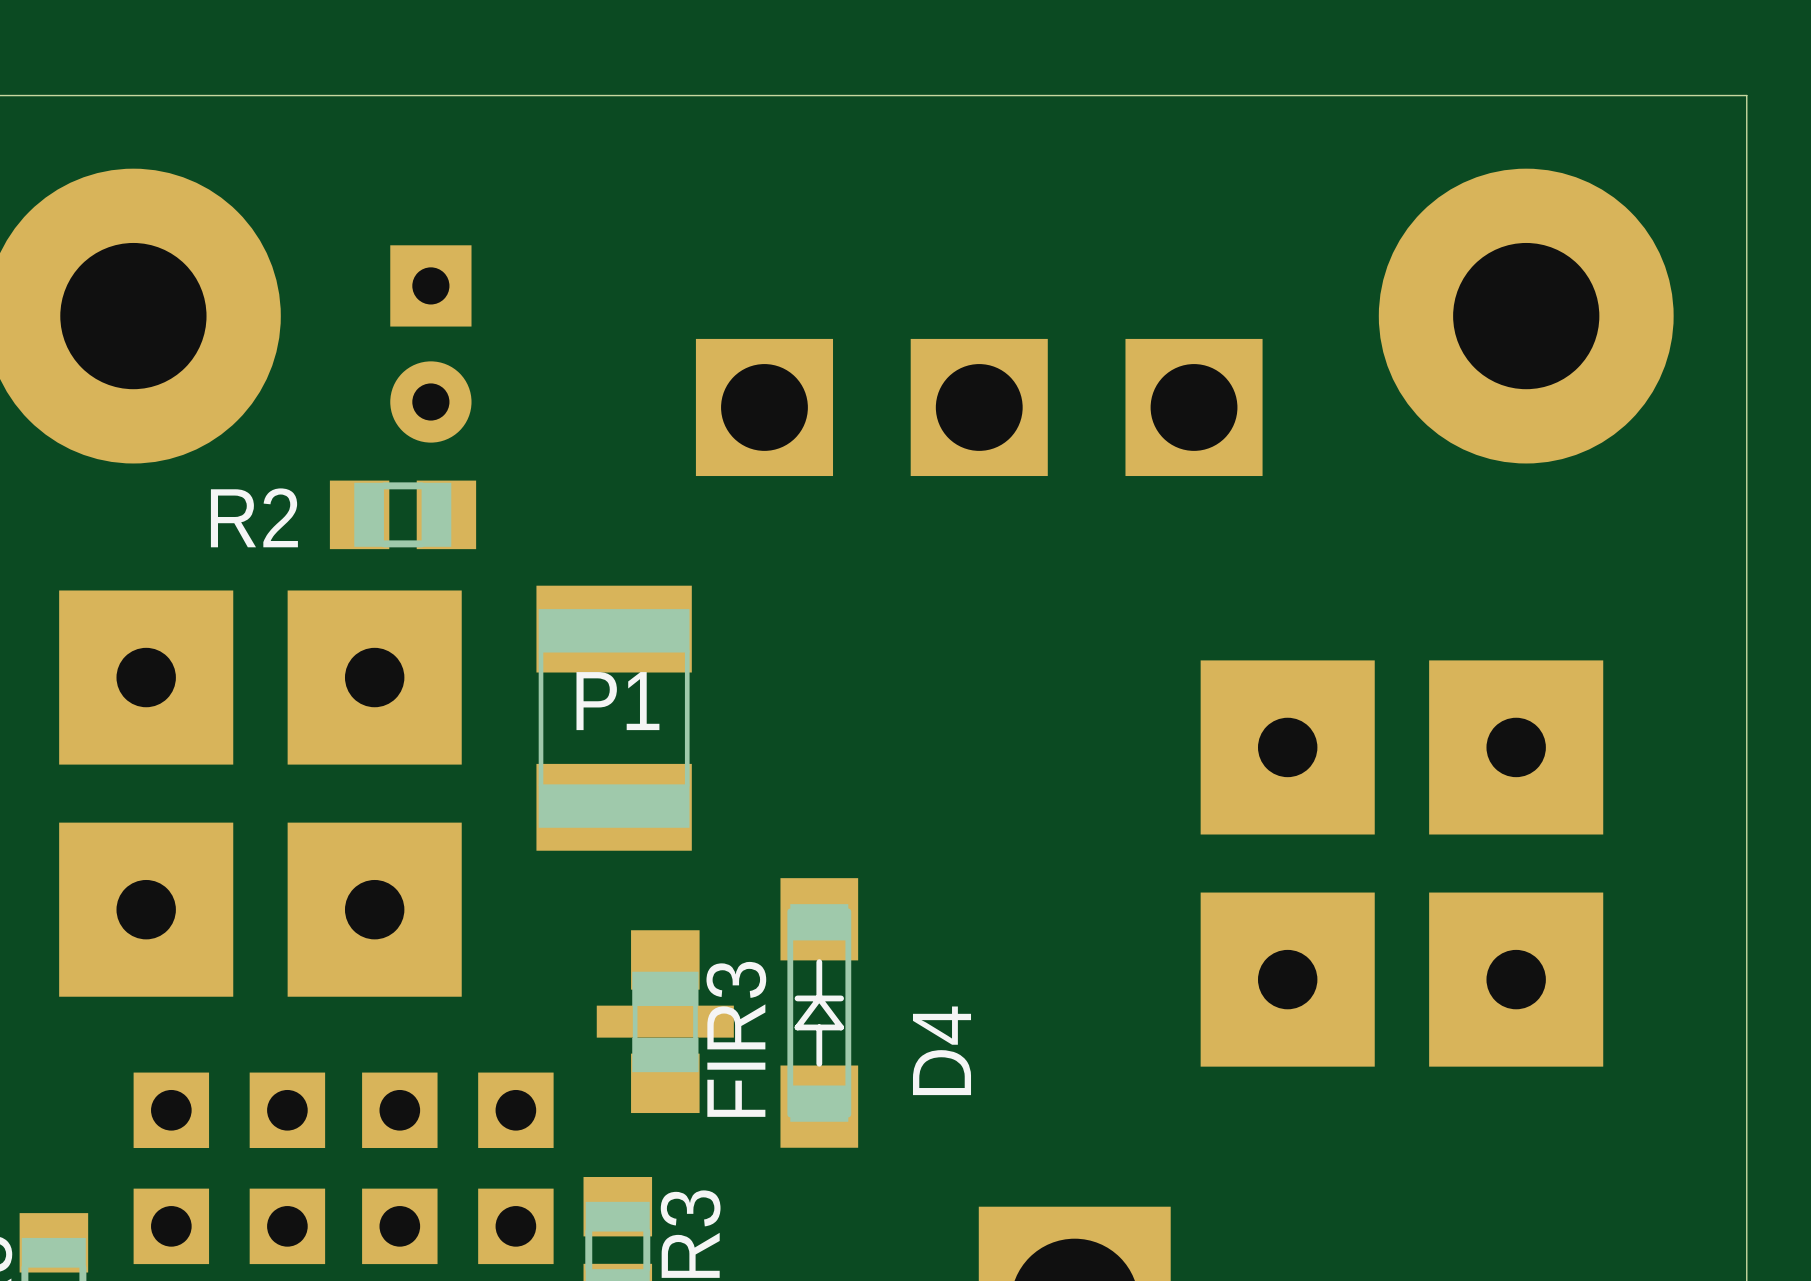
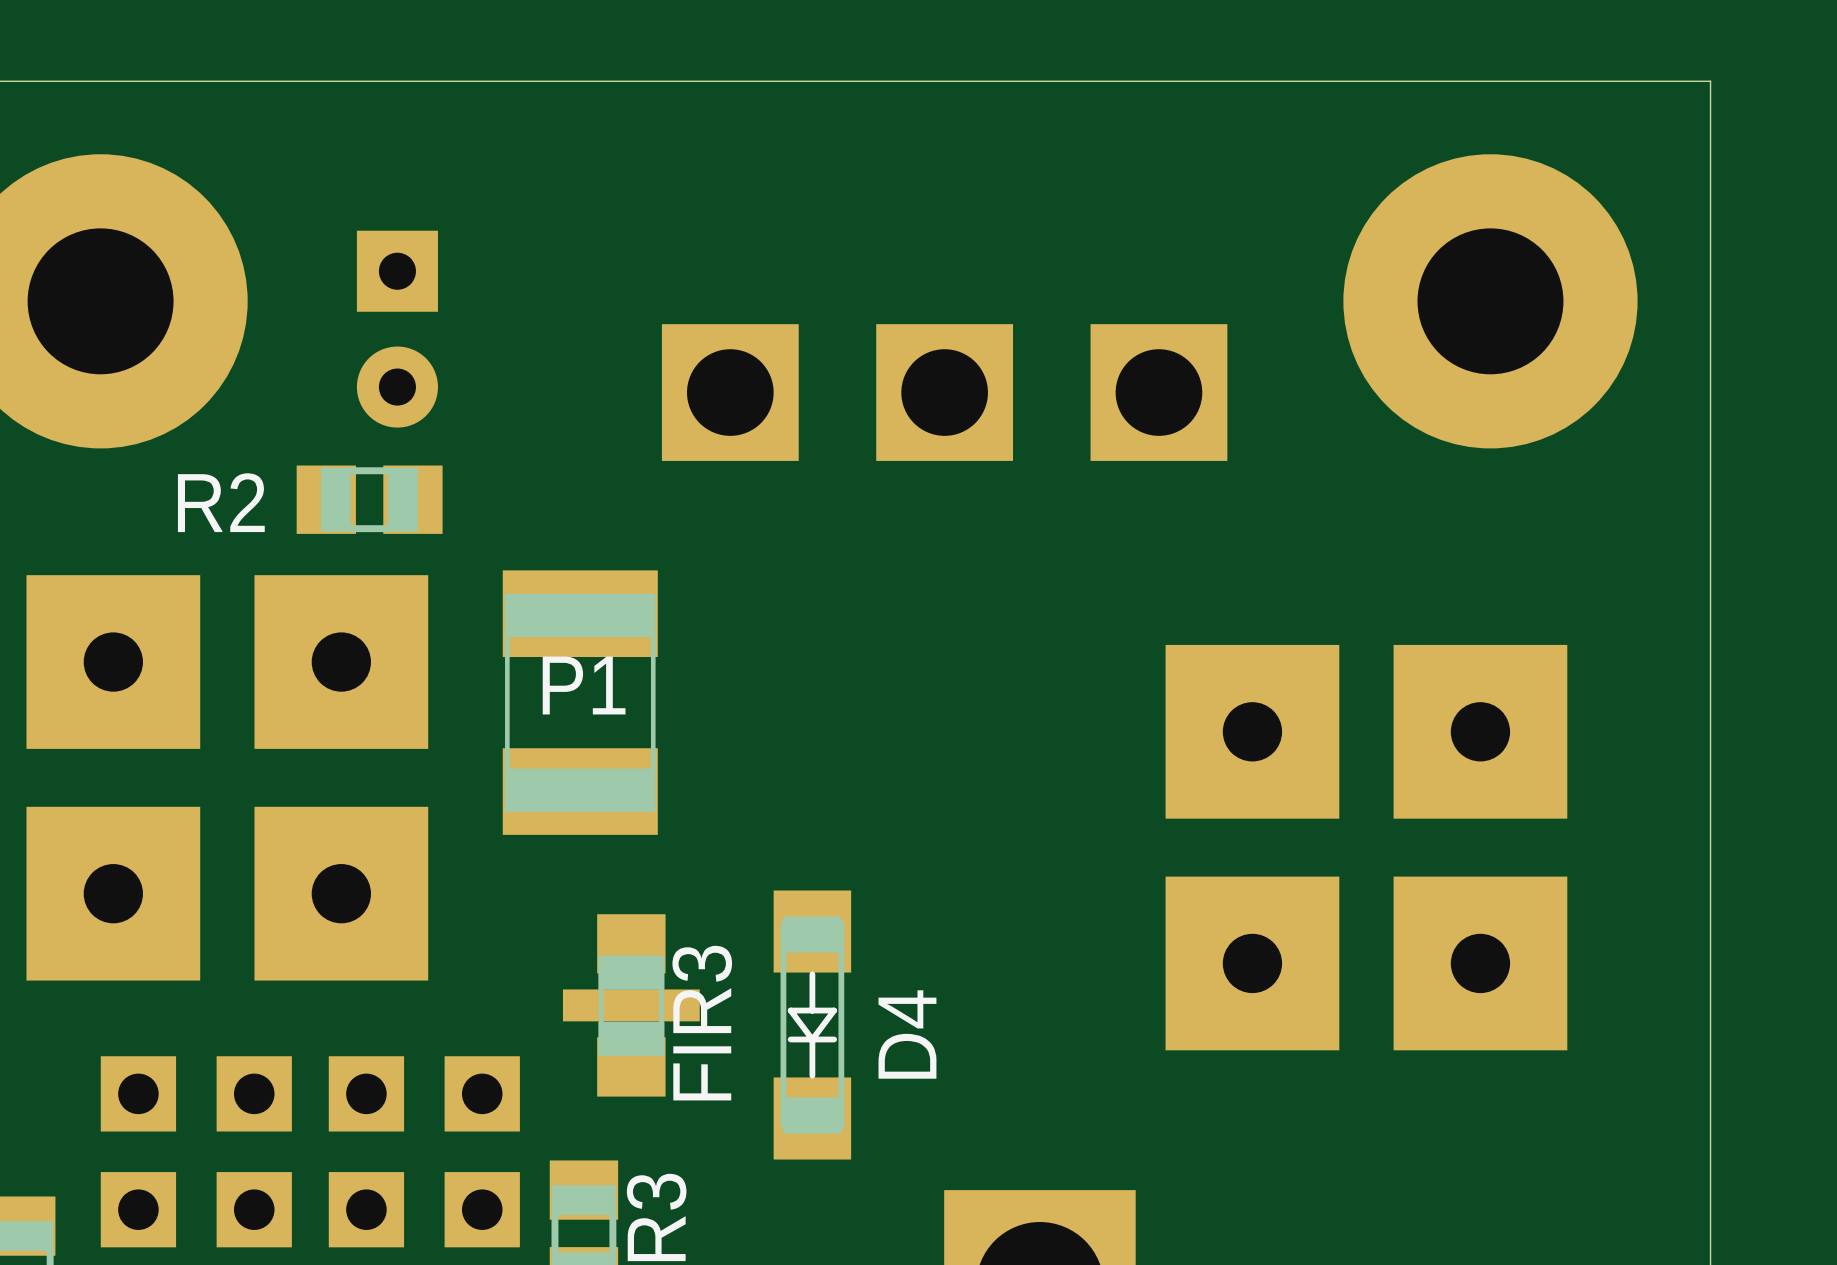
part position: (819, 1012) -> (812, 1025)

